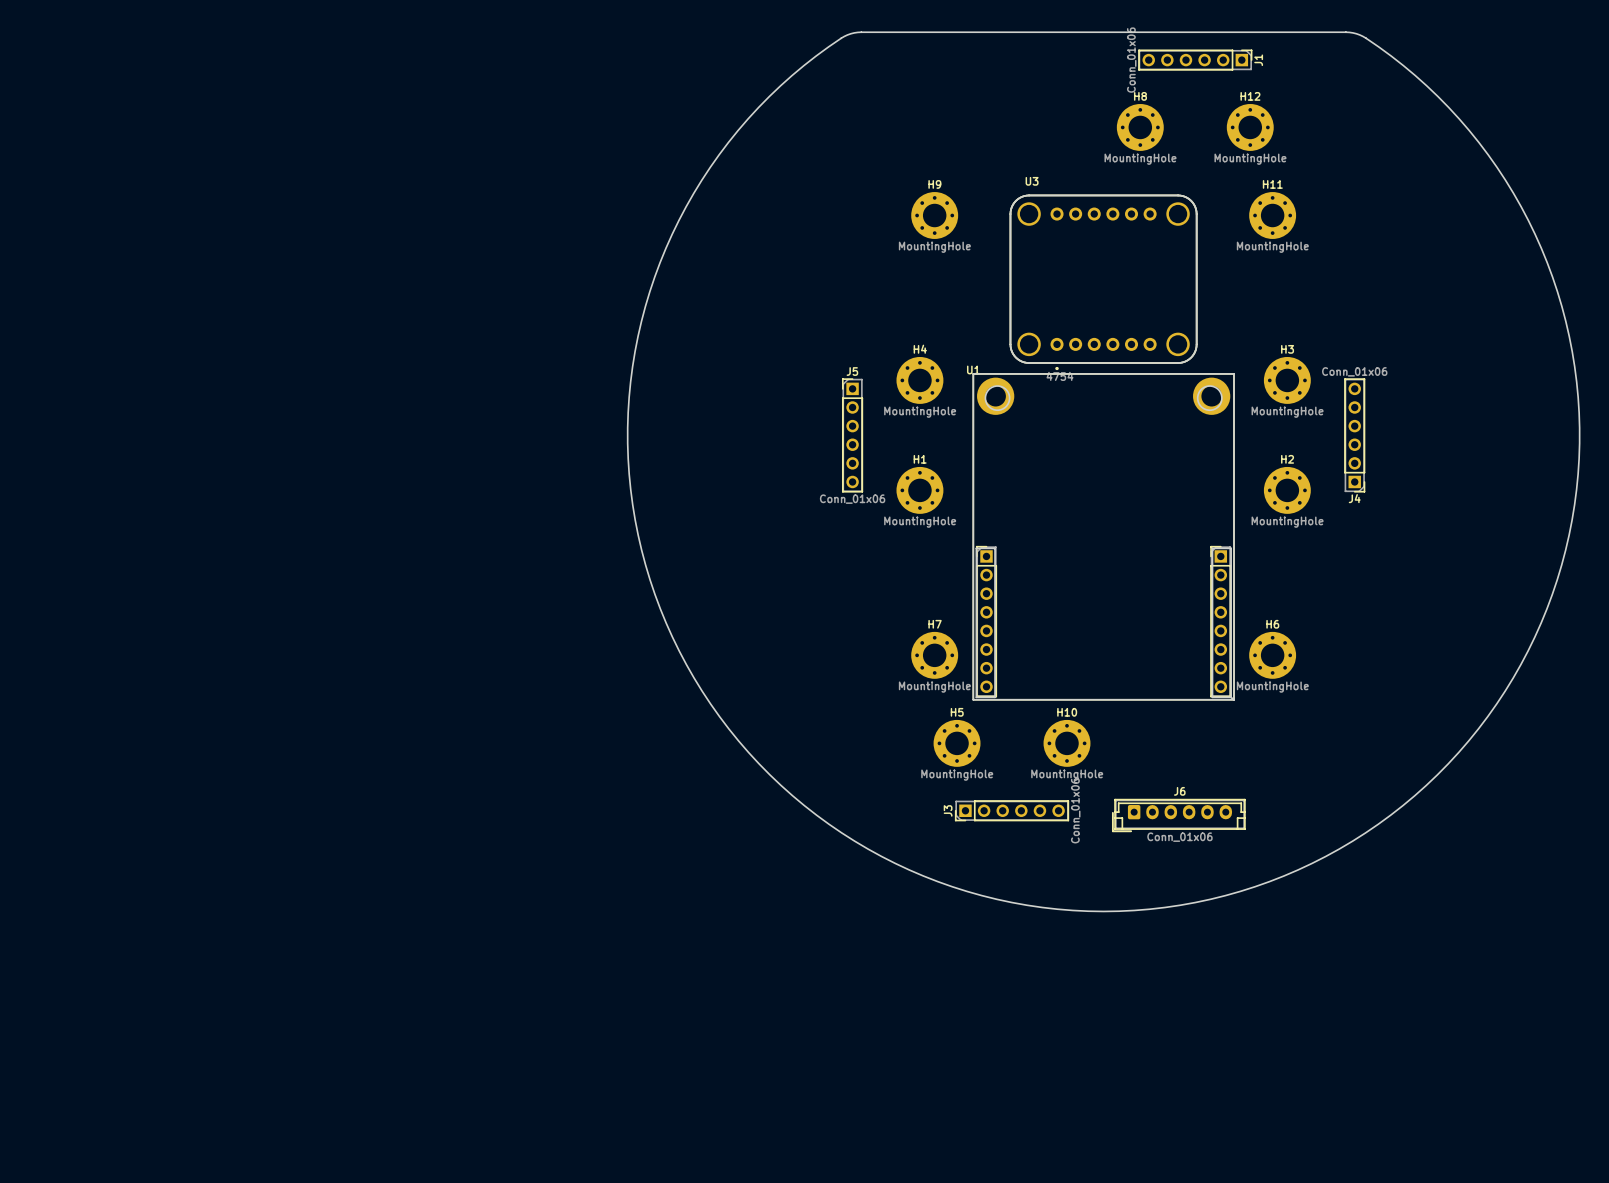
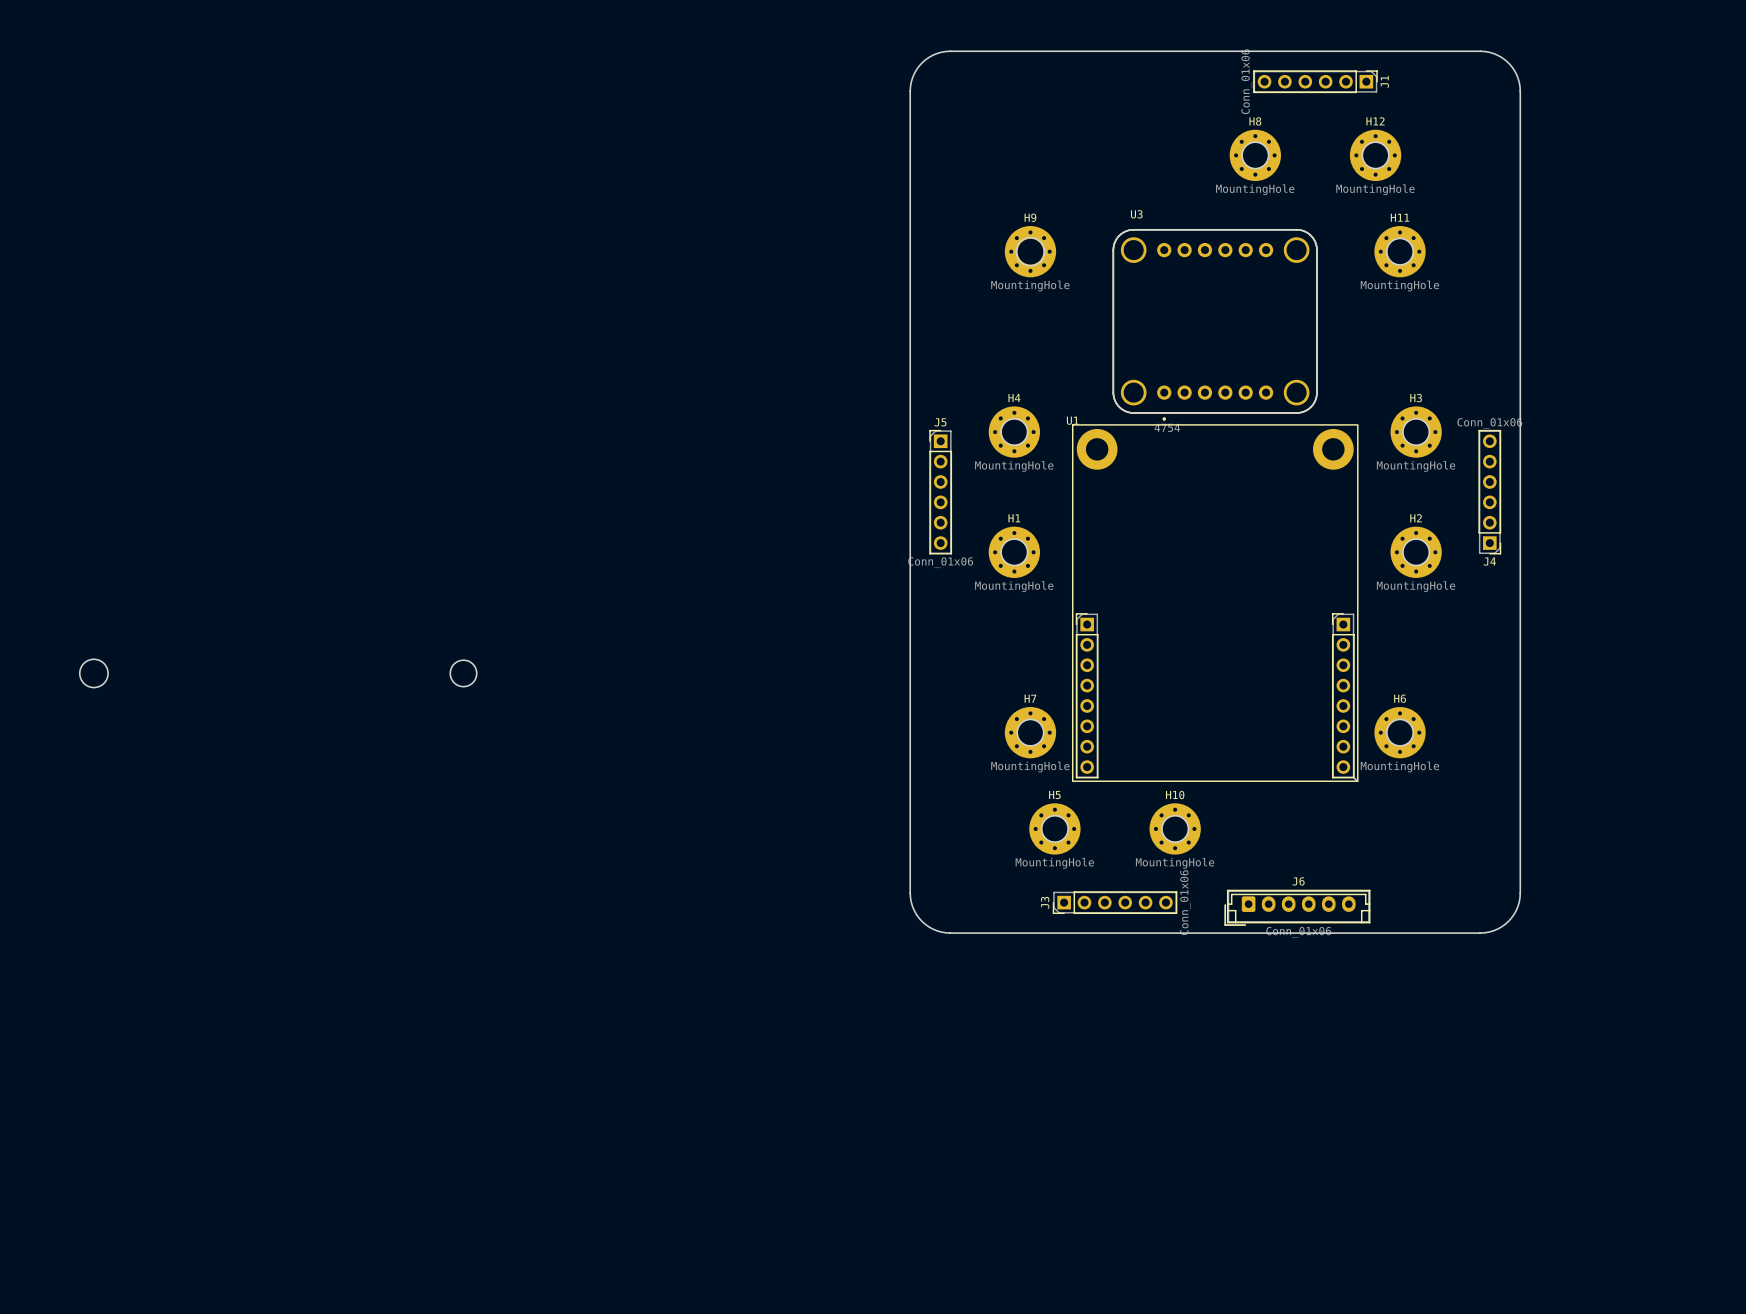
board edge: (861, 32) (844, 36) (816, 56) (780, 85) (748, 118) (701, 180) (678, 220) (660, 262) (638, 336) (628, 412) (630, 489) (645, 565) (672, 637) (710, 704) (759, 763) (816, 815) (881, 856) (952, 886) (1026, 905) (1103, 911) (1180, 905) (1255, 886) (1325, 856) (1390, 815) (1448, 763) (1496, 704) (1534, 637) (1561, 565) (1576, 489) (1579, 412) (1569, 336) (1547, 262) (1528, 220) (1505, 180) (1459, 118) (1426, 85) (1391, 56) (1363, 36) (1345, 32) -> (950, 51) (937, 53) (921, 63) (912, 78) (910, 91) (910, 893) (914, 910) (921, 921) (937, 930) (950, 933) (1480, 933) (1497, 929) (1508, 921) (1514, 914) (1519, 901) (1520, 893) (1520, 91) (1516, 73) (1508, 63) (1493, 53) (1480, 51)
round board edge: none -> [1241, 141, 1270, 170]
round board edge: none -> [1361, 141, 1390, 170]
round board edge: none -> [1015, 236, 1046, 267]
round board edge: none -> [1386, 237, 1415, 266]
round board edge: none -> [1000, 418, 1029, 447]
round board edge: none -> [1402, 418, 1431, 447]
board edge: (973, 373) (973, 699) (1234, 699) (1234, 373) (973, 373) -> none
round board edge: [984, 385, 1011, 411] -> none
round board edge: [1196, 385, 1223, 411] -> none
round board edge: none -> [1000, 538, 1029, 567]
round board edge: none -> [1402, 538, 1431, 567]
board edge: (976, 548) (976, 697) (995, 697) (995, 548) (976, 548) -> none
board edge: (1212, 548) (1212, 697) (1231, 697) (1231, 548) (1212, 548) -> none
round board edge: none -> [78, 658, 109, 689]
round board edge: none -> [449, 659, 478, 688]
round board edge: none -> [1016, 718, 1045, 747]
round board edge: none -> [1386, 718, 1415, 747]
round board edge: none -> [1040, 814, 1069, 843]
round board edge: none -> [1161, 814, 1190, 843]

